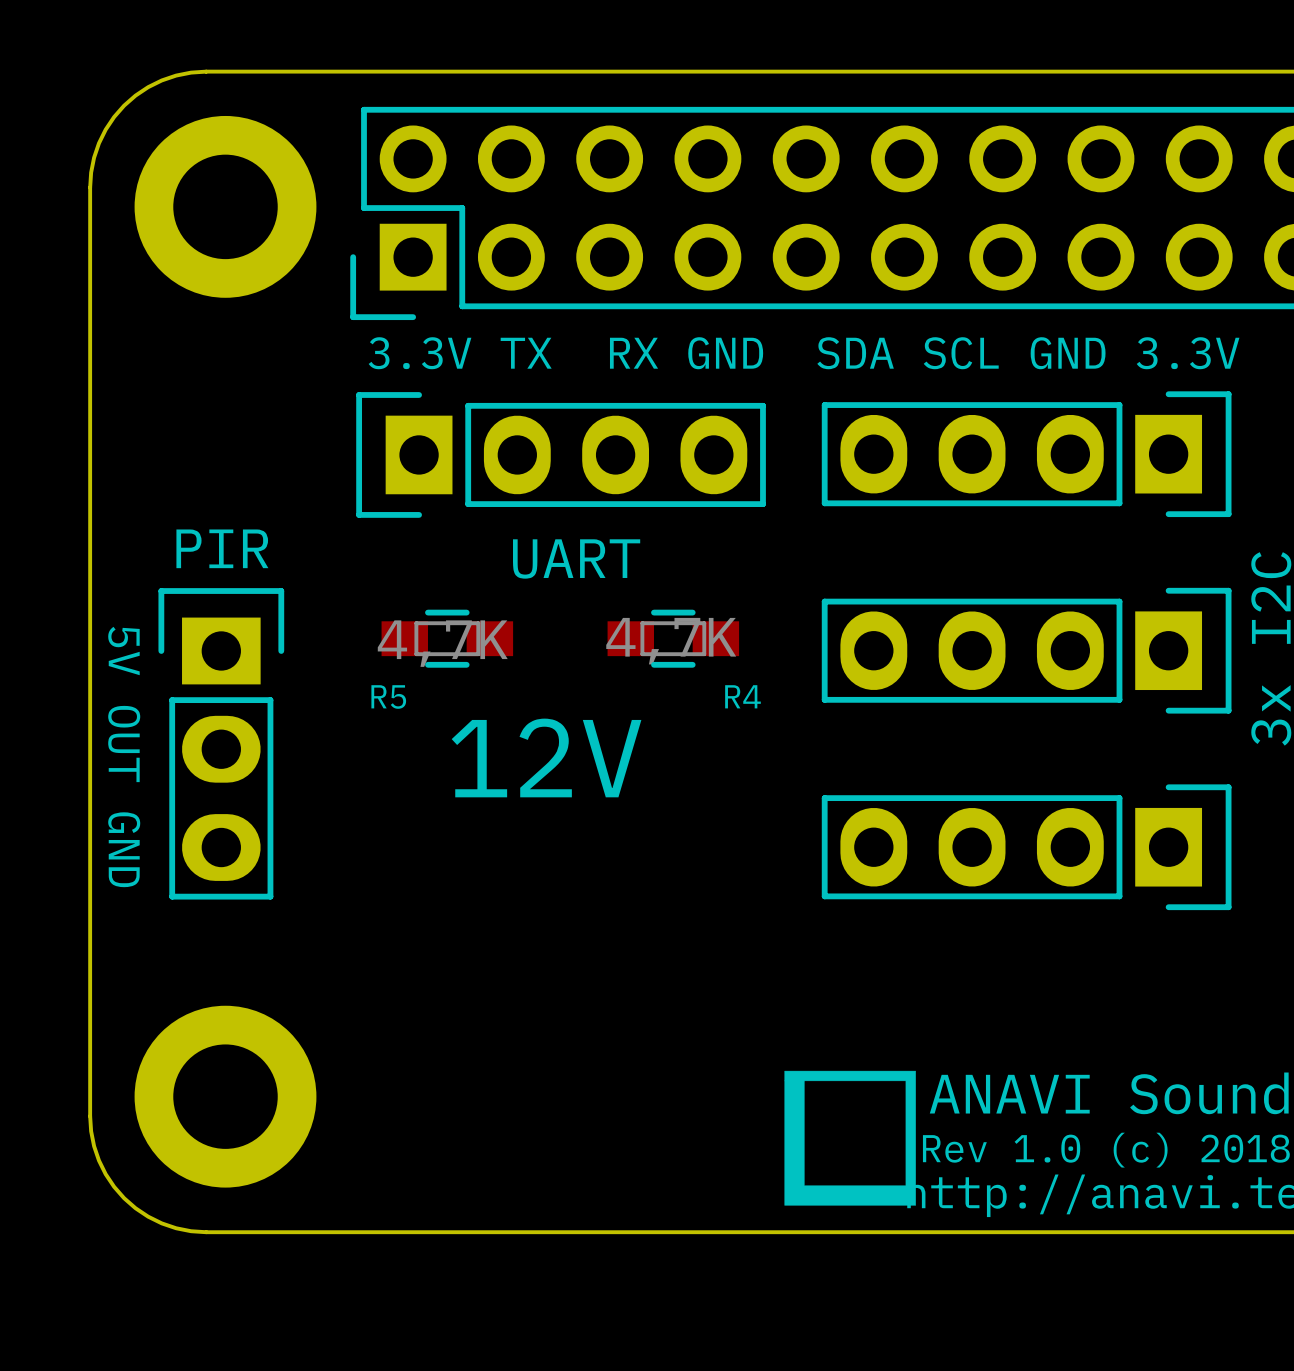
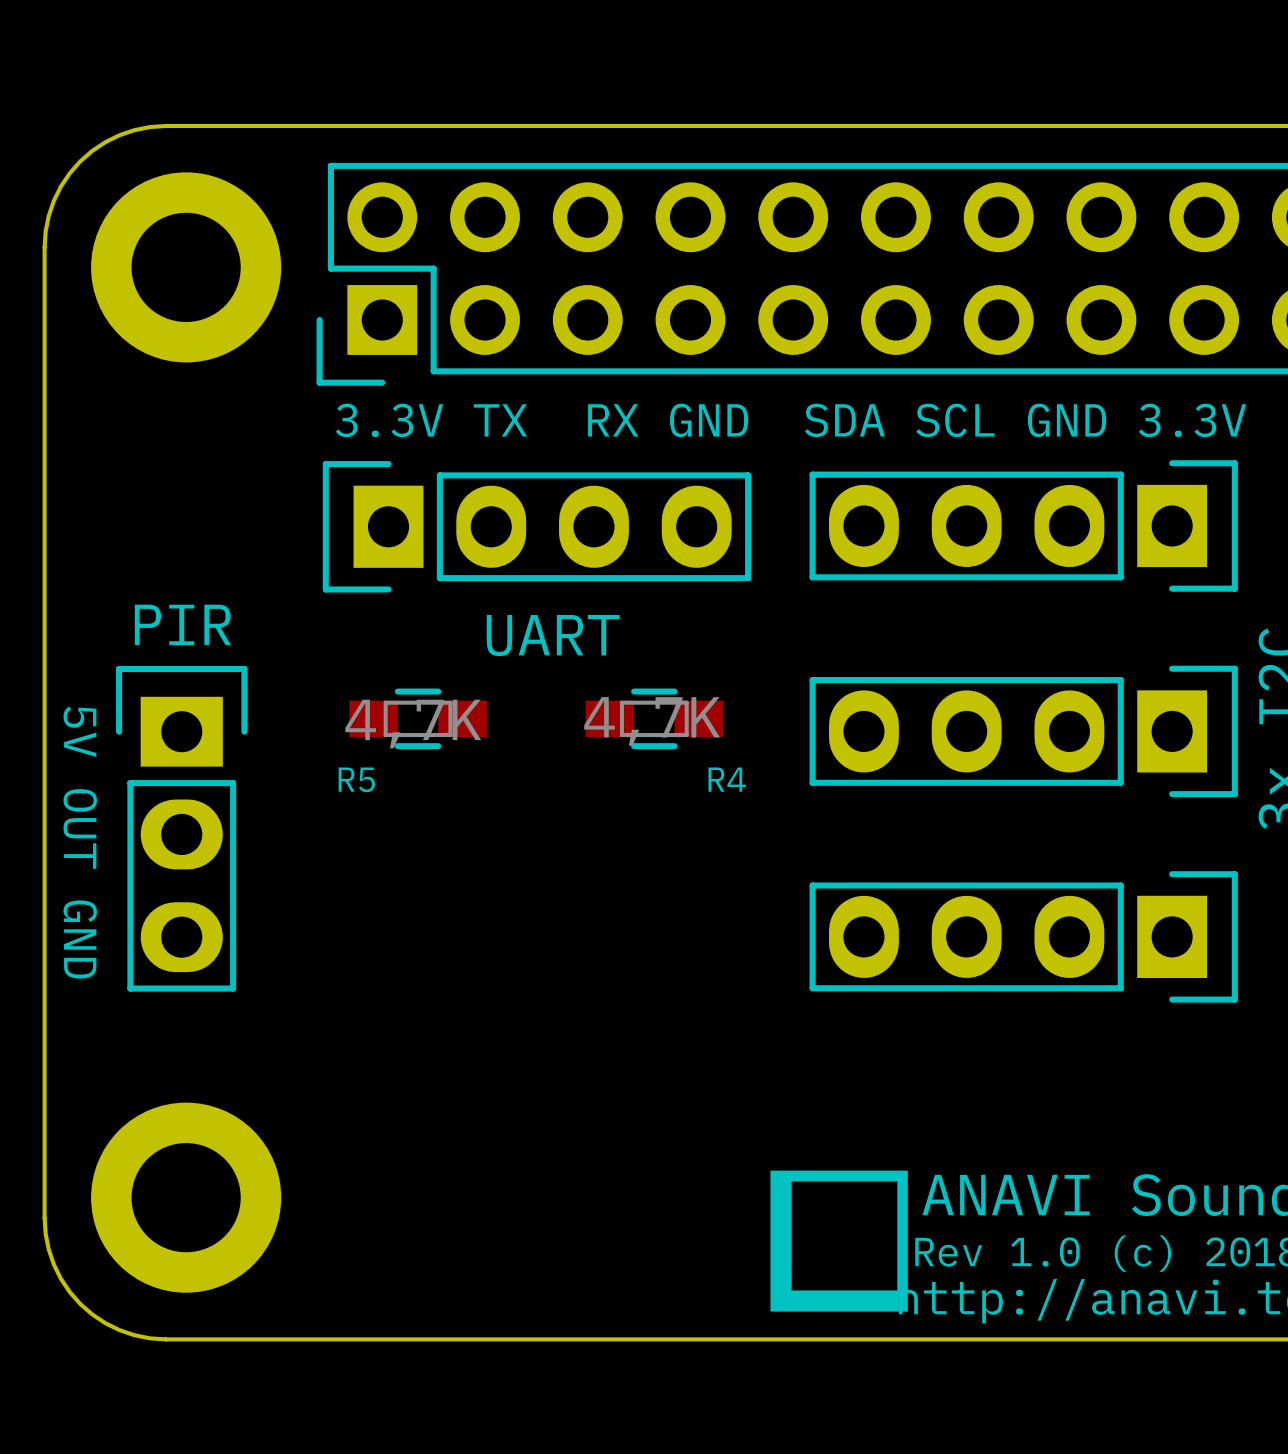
text: 12V (546, 757) -> none

